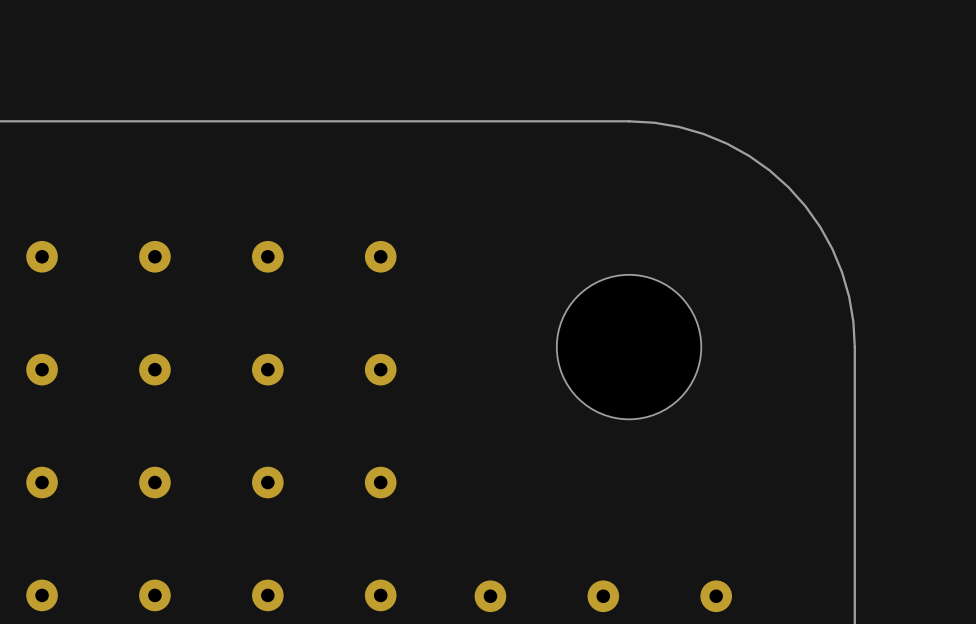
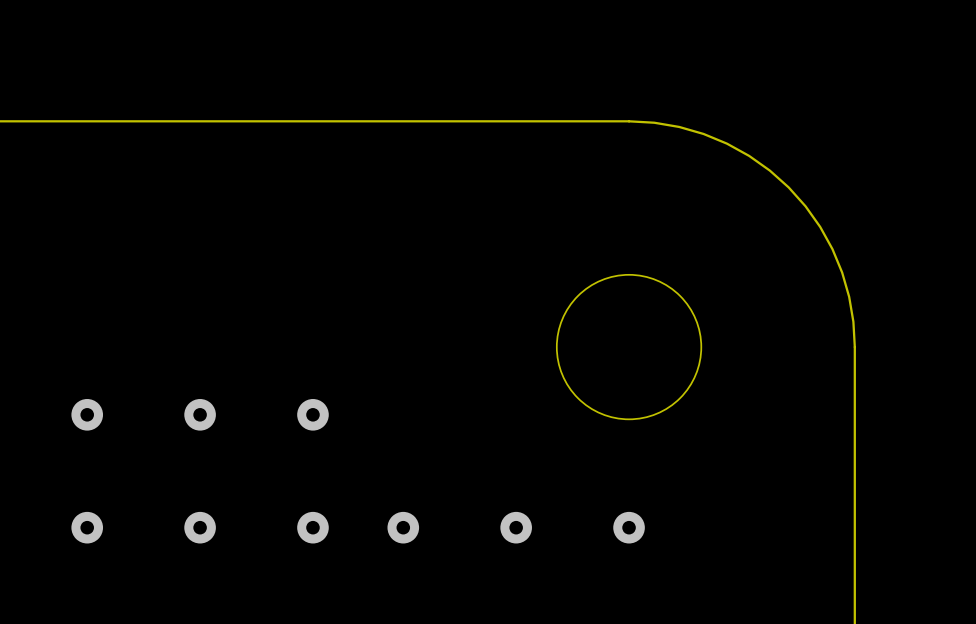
via: (42, 256) -> none
via: (154, 256) -> none
via: (267, 256) -> none
via: (380, 256) -> none
via: (42, 369) -> none
via: (154, 369) -> none
via: (267, 369) -> none
via: (380, 369) -> none
via: none -> (87, 414)
via: none -> (200, 414)
via: none -> (312, 414)
via: (42, 482) -> none
via: (154, 482) -> none
via: (267, 482) -> none
via: (380, 482) -> none
via: none -> (87, 527)
via: none -> (200, 527)
via: none -> (312, 527)
via: none -> (403, 527)
via: none -> (516, 527)
via: none -> (629, 527)
via: (42, 595) -> none
via: (154, 595) -> none
via: (267, 595) -> none
via: (380, 595) -> none
via: (490, 596) -> none
via: (603, 596) -> none
via: (716, 596) -> none

